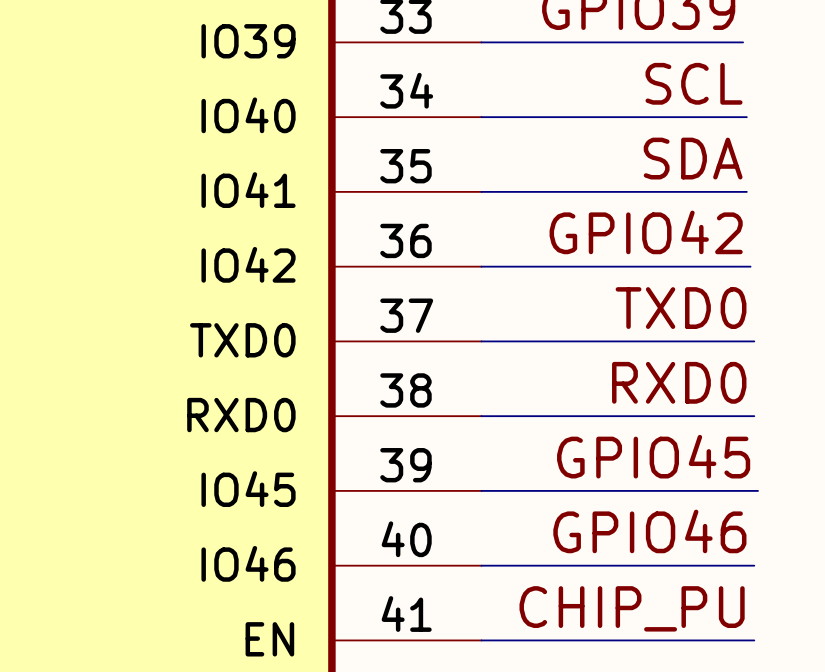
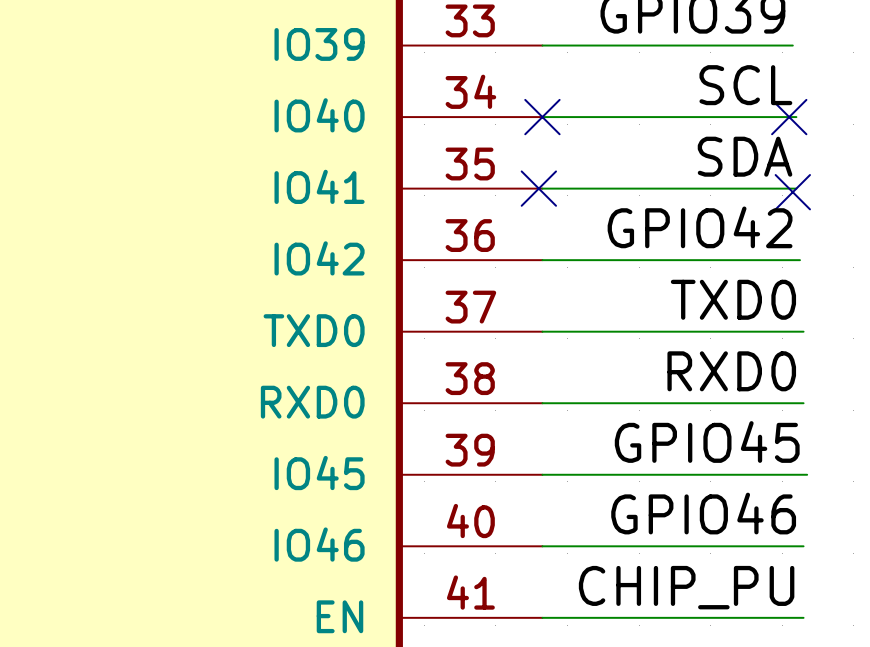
no-connect mark: none -> (542, 117)
no-connect mark: none -> (789, 117)
no-connect mark: none -> (538, 188)
no-connect mark: none -> (792, 192)

